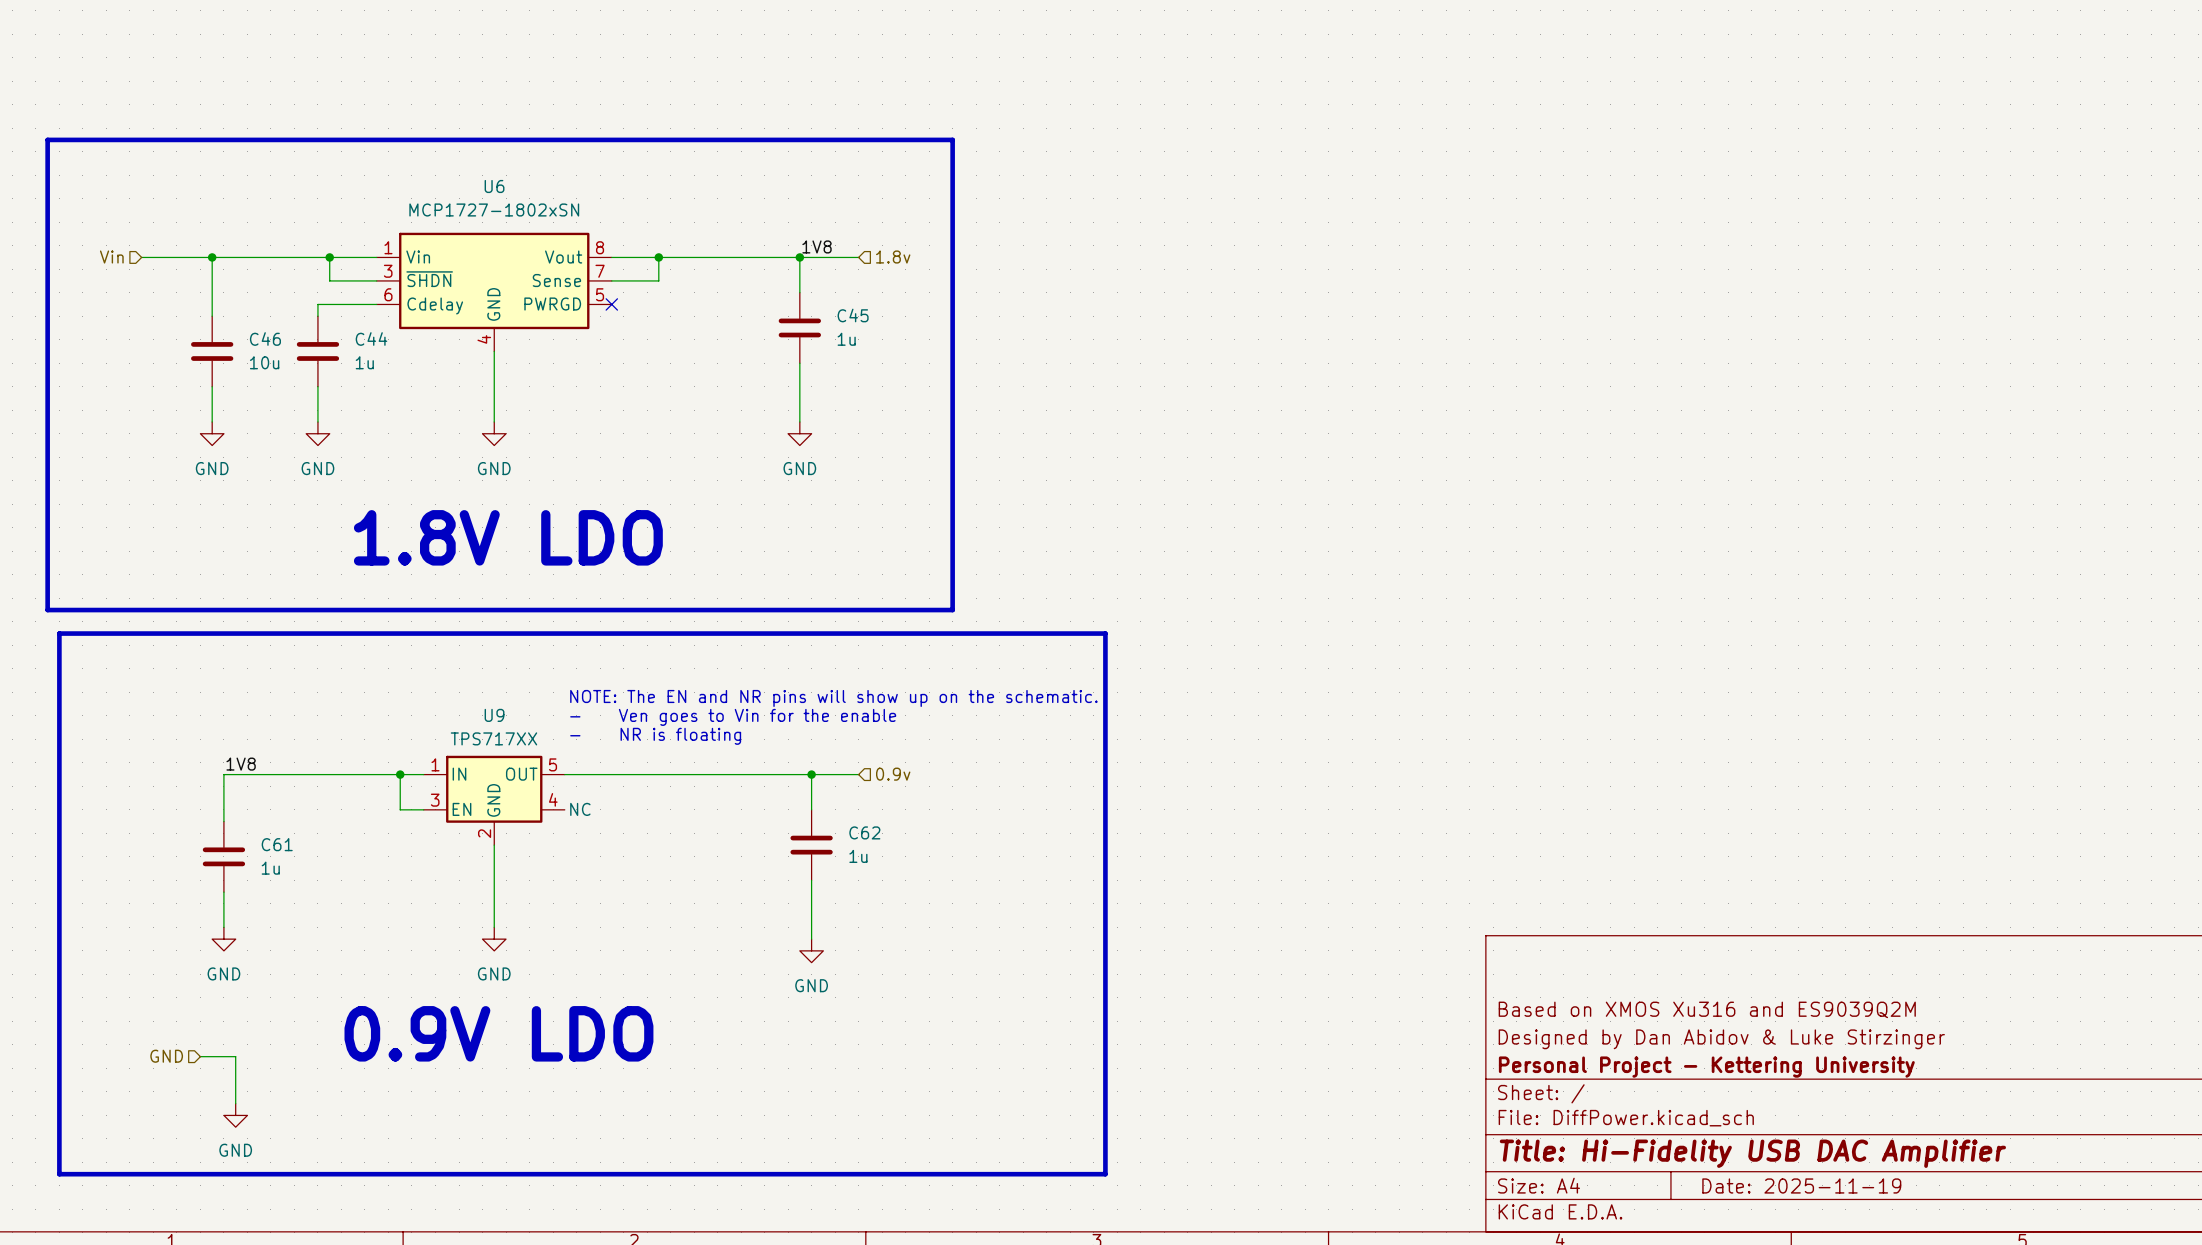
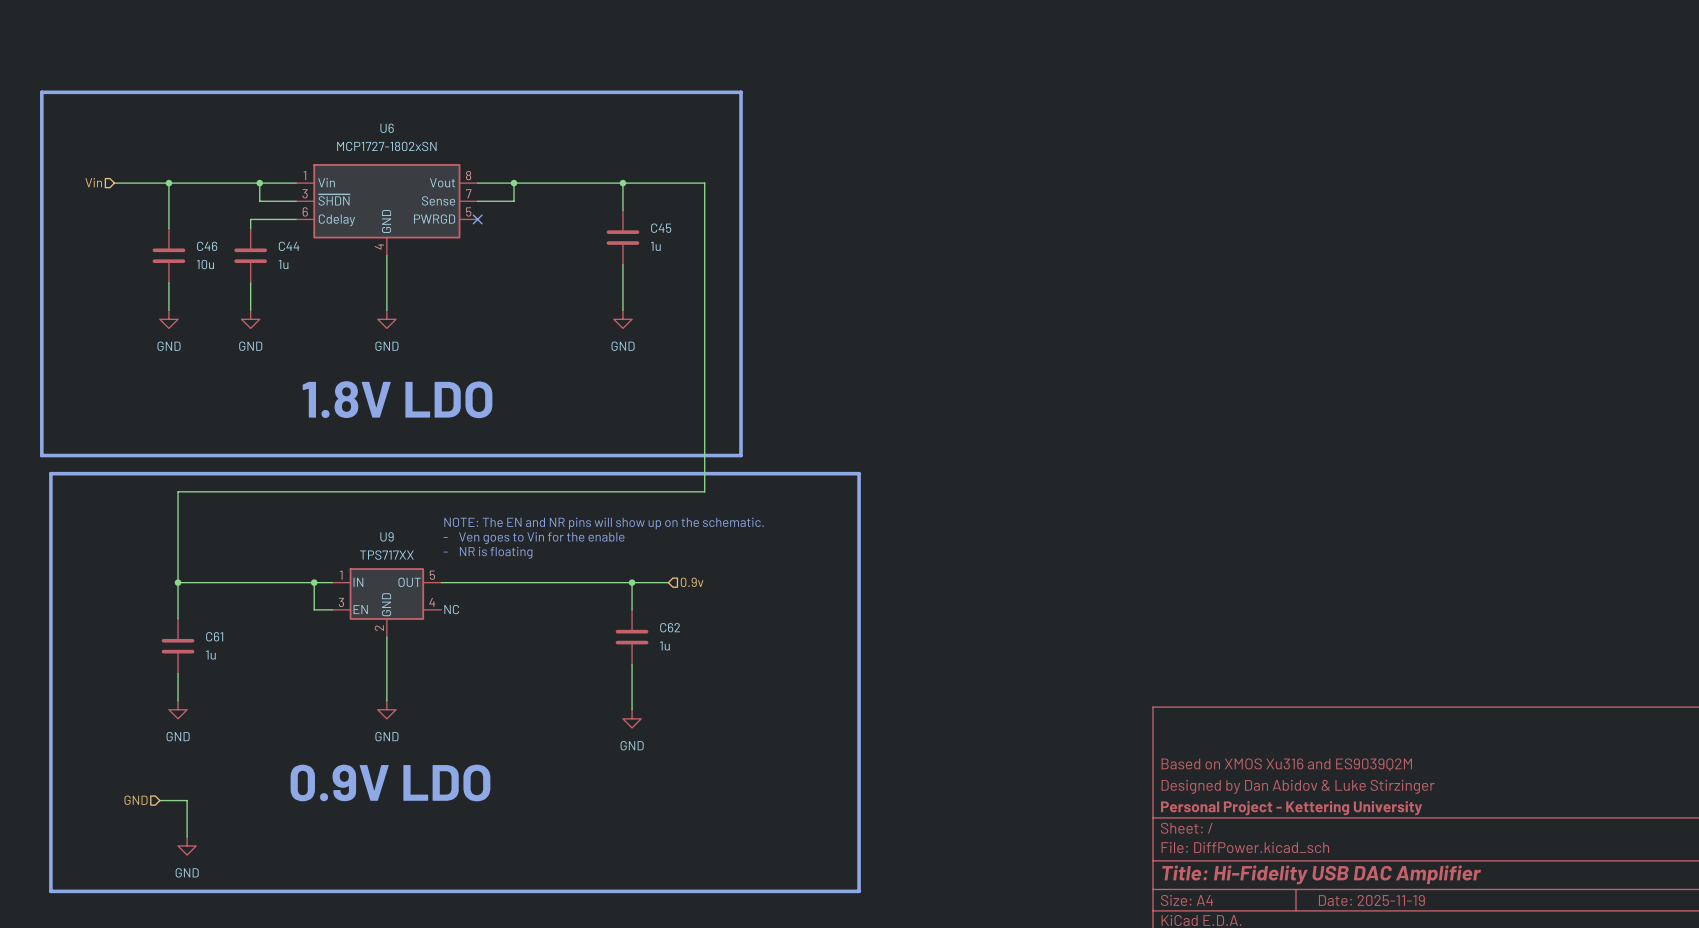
label: 1V8 (817, 246) -> none
wire: none -> (668, 183) (704, 183) (704, 491) (178, 491) (178, 582)
hierarchical label: 1.8v (893, 257) -> none
label: 1V8 (241, 764) -> none
junction: none -> (178, 582)

